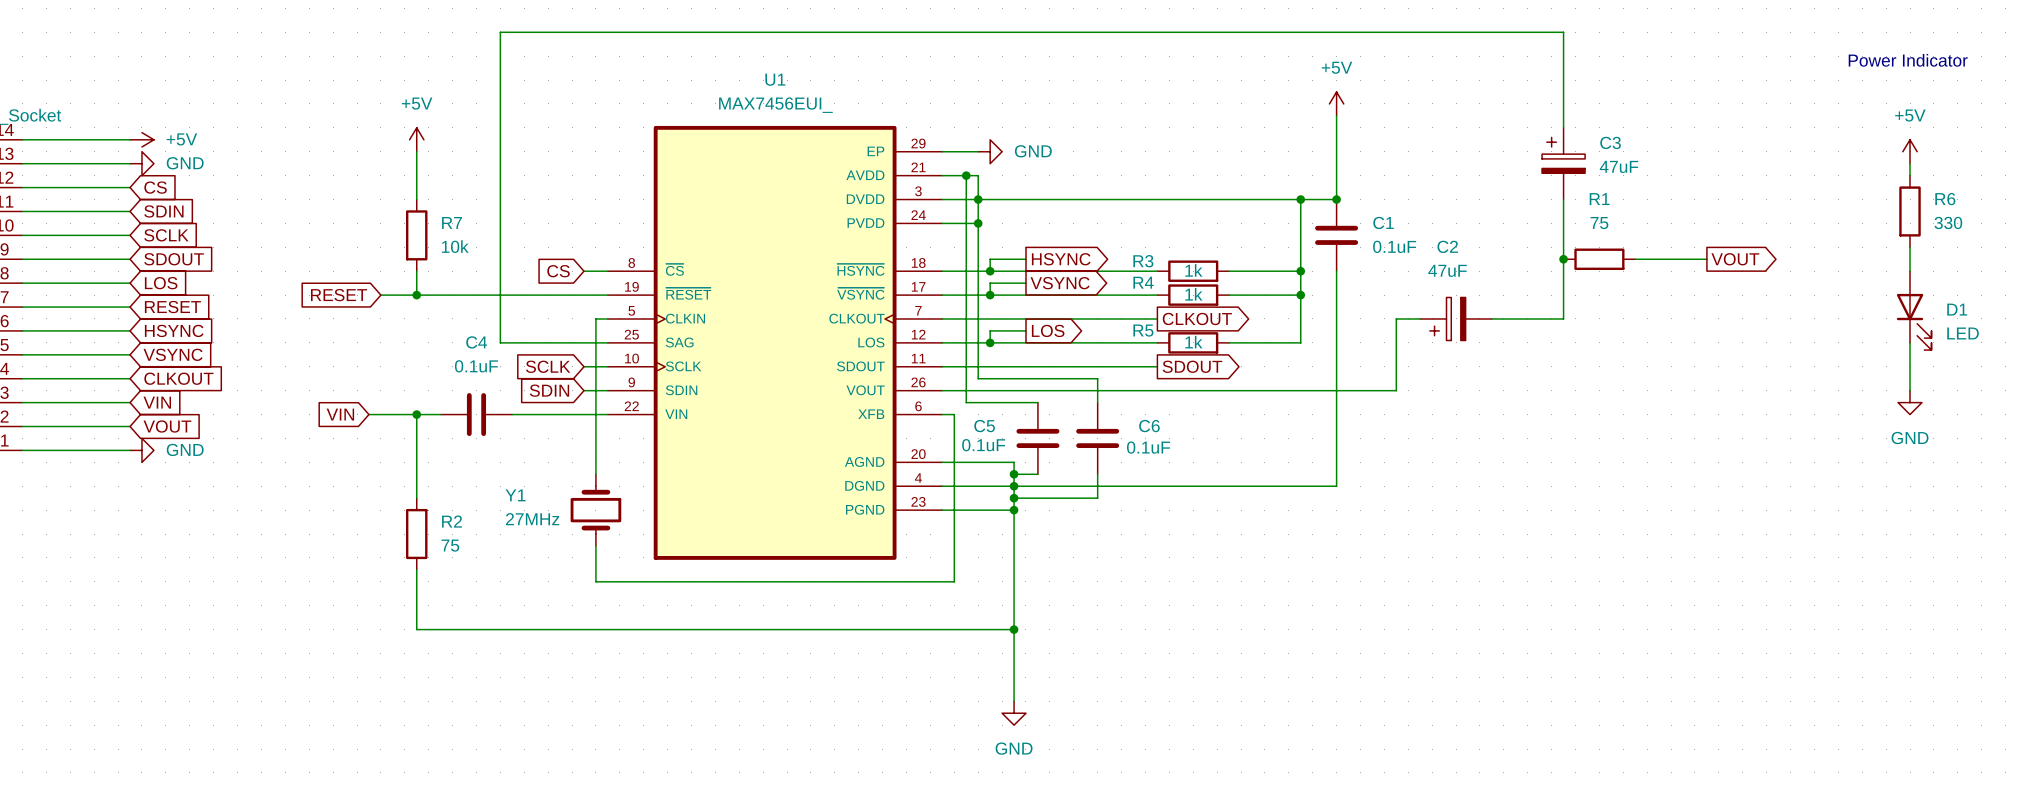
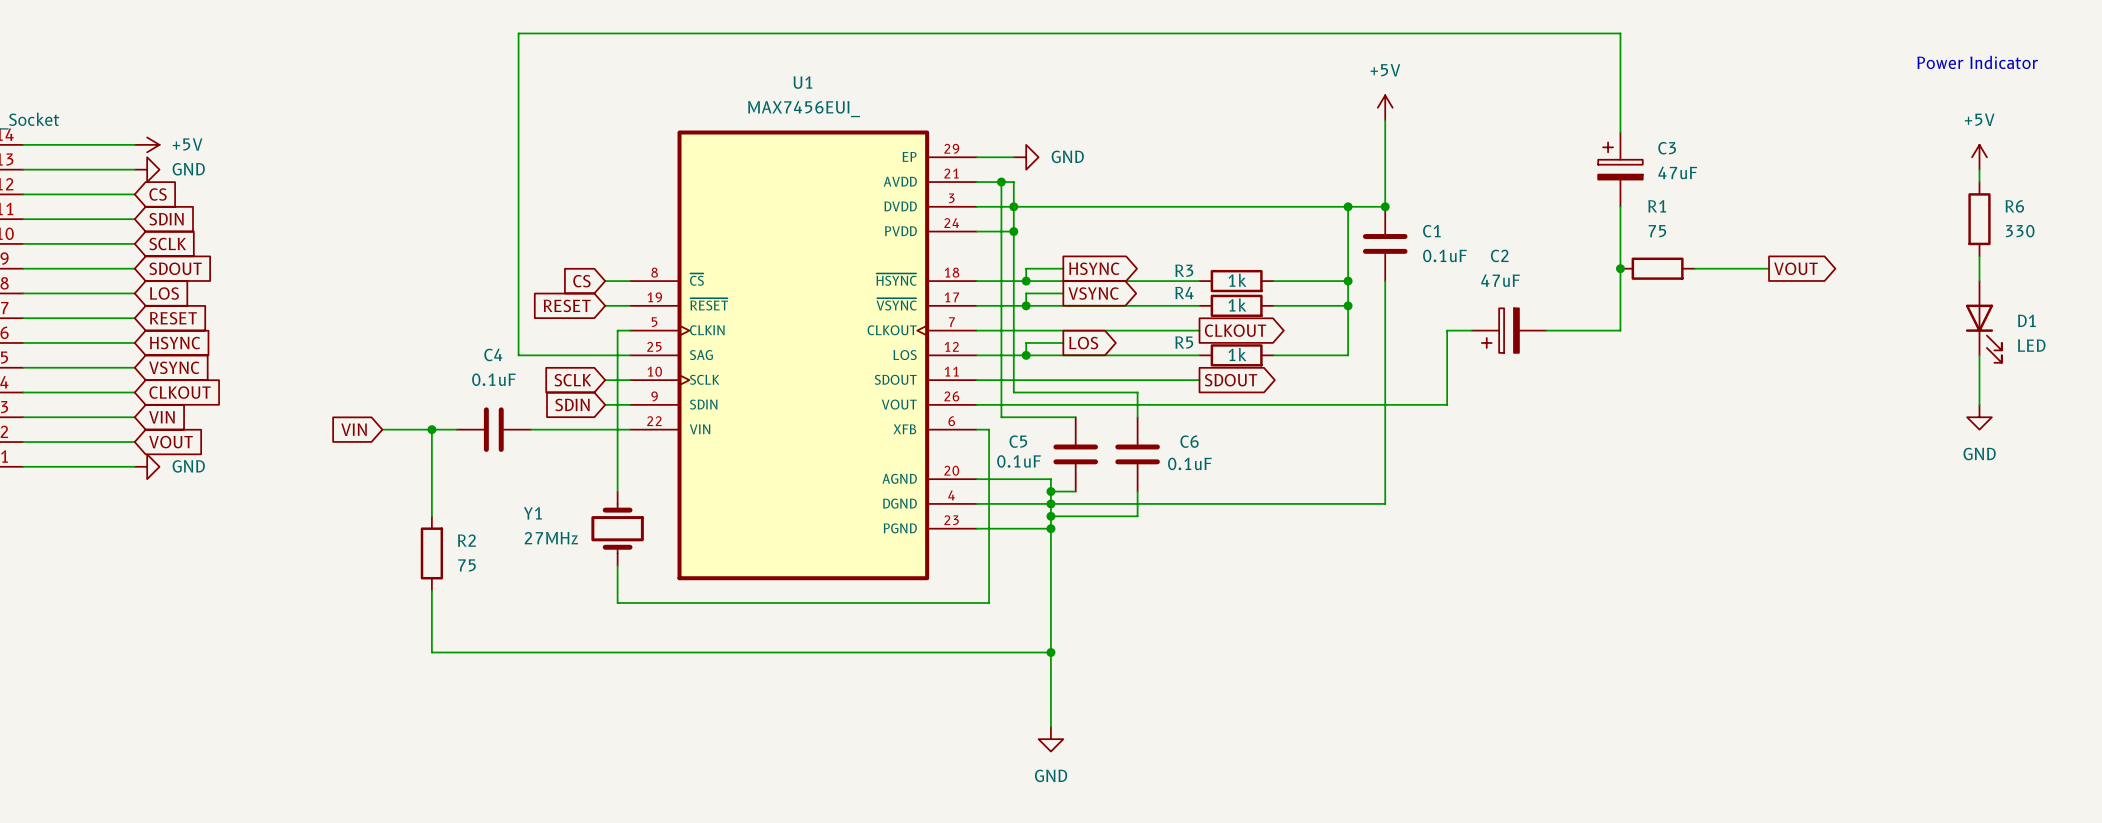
power symbol: +5V (416, 139) -> none
wire: (416, 151) (416, 199) -> none
R7: 10k (416, 235) -> none
wire: (416, 271) (416, 295) -> none
global label position: RESET (339, 295) -> RESET (567, 305)
wire: (380, 295) (583, 295) -> none
junction: (416, 295) -> none

